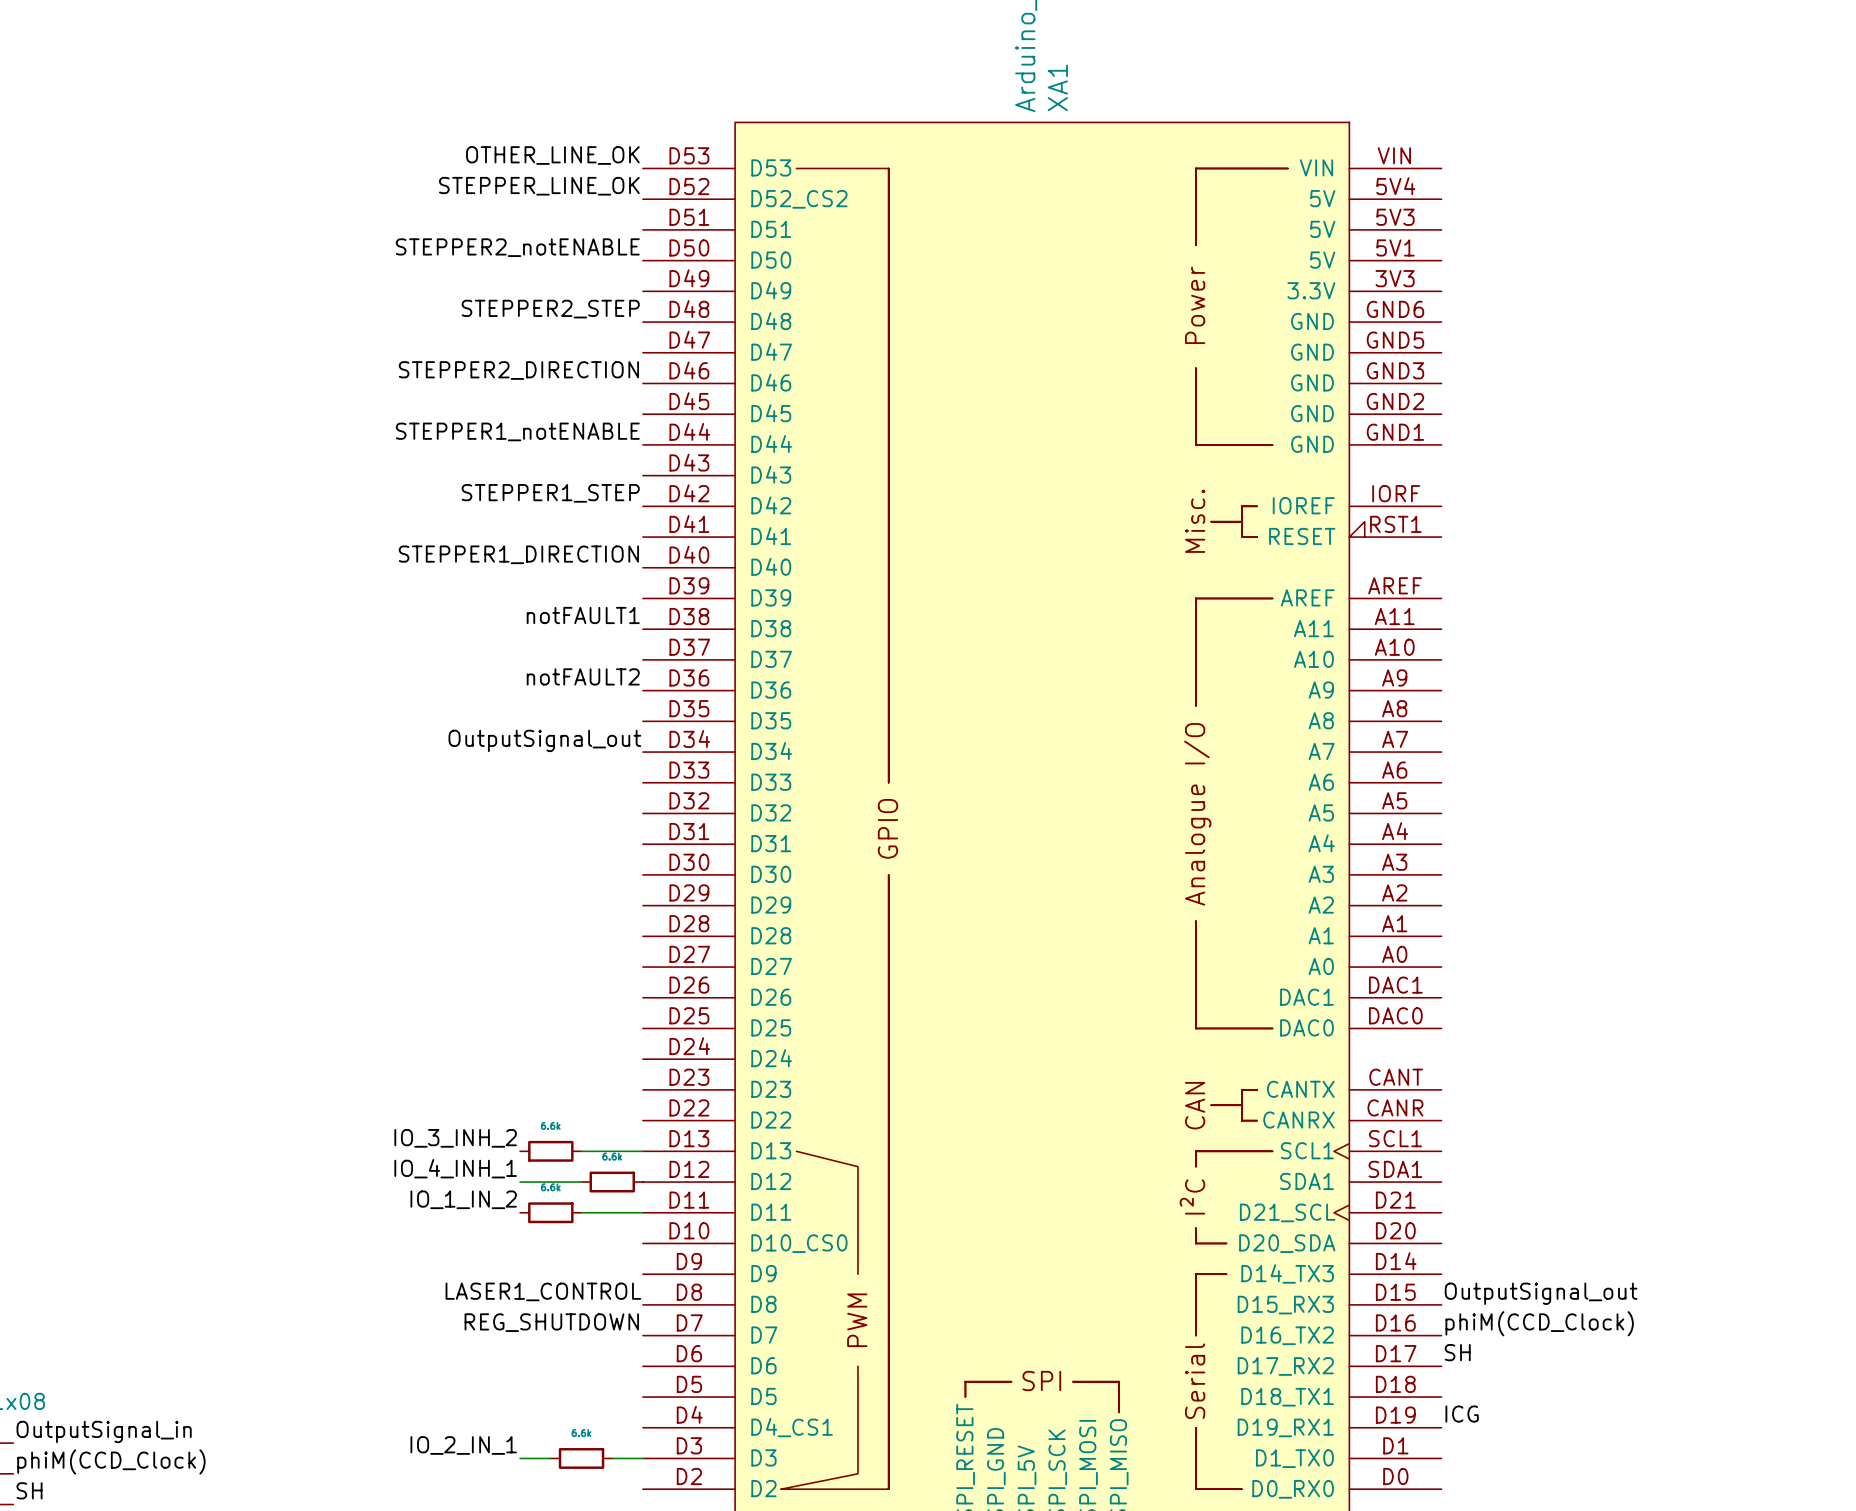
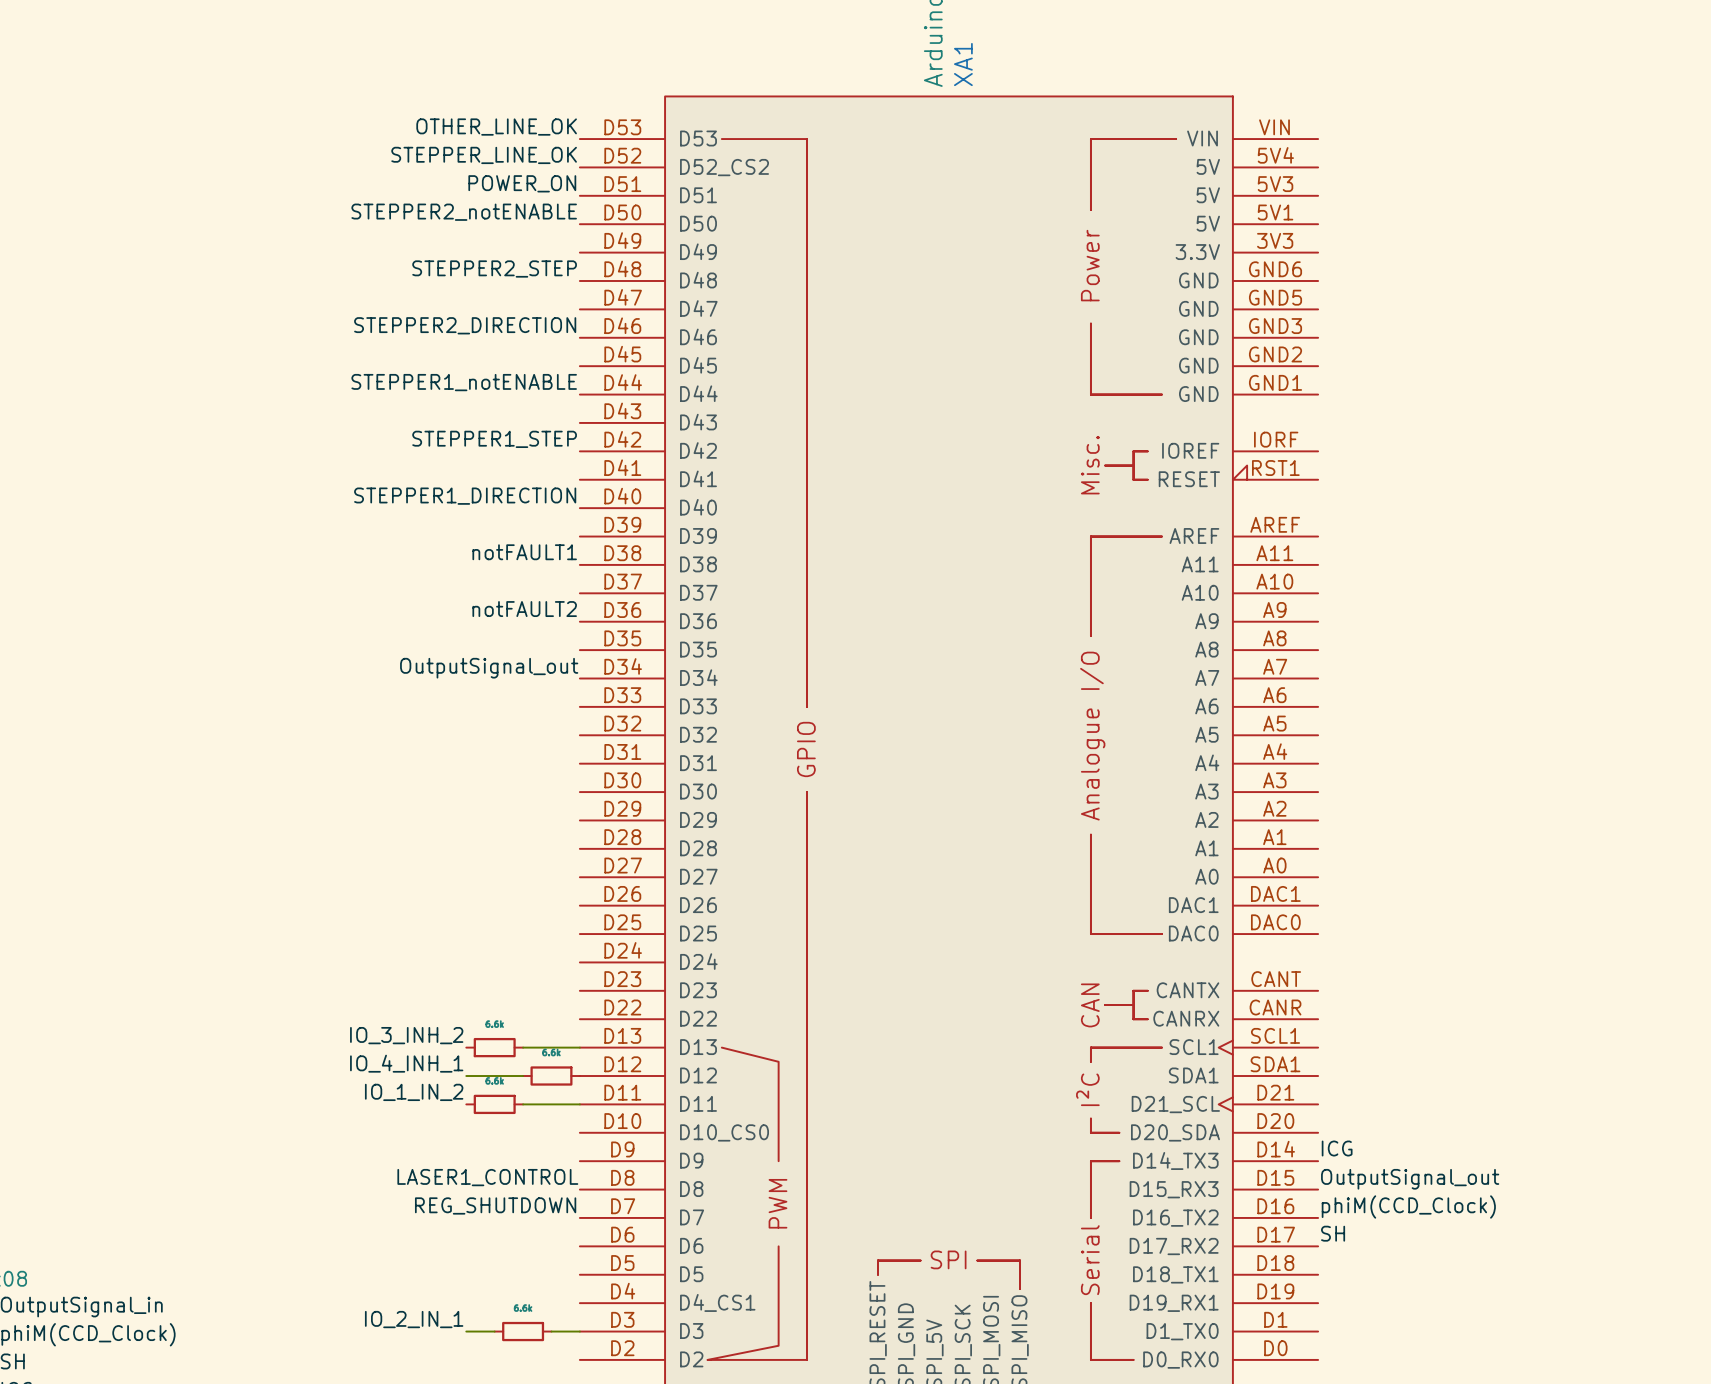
label: none -> POWER_ON (522, 183)
label position: ICG (1462, 1414) -> ICG (1337, 1148)

